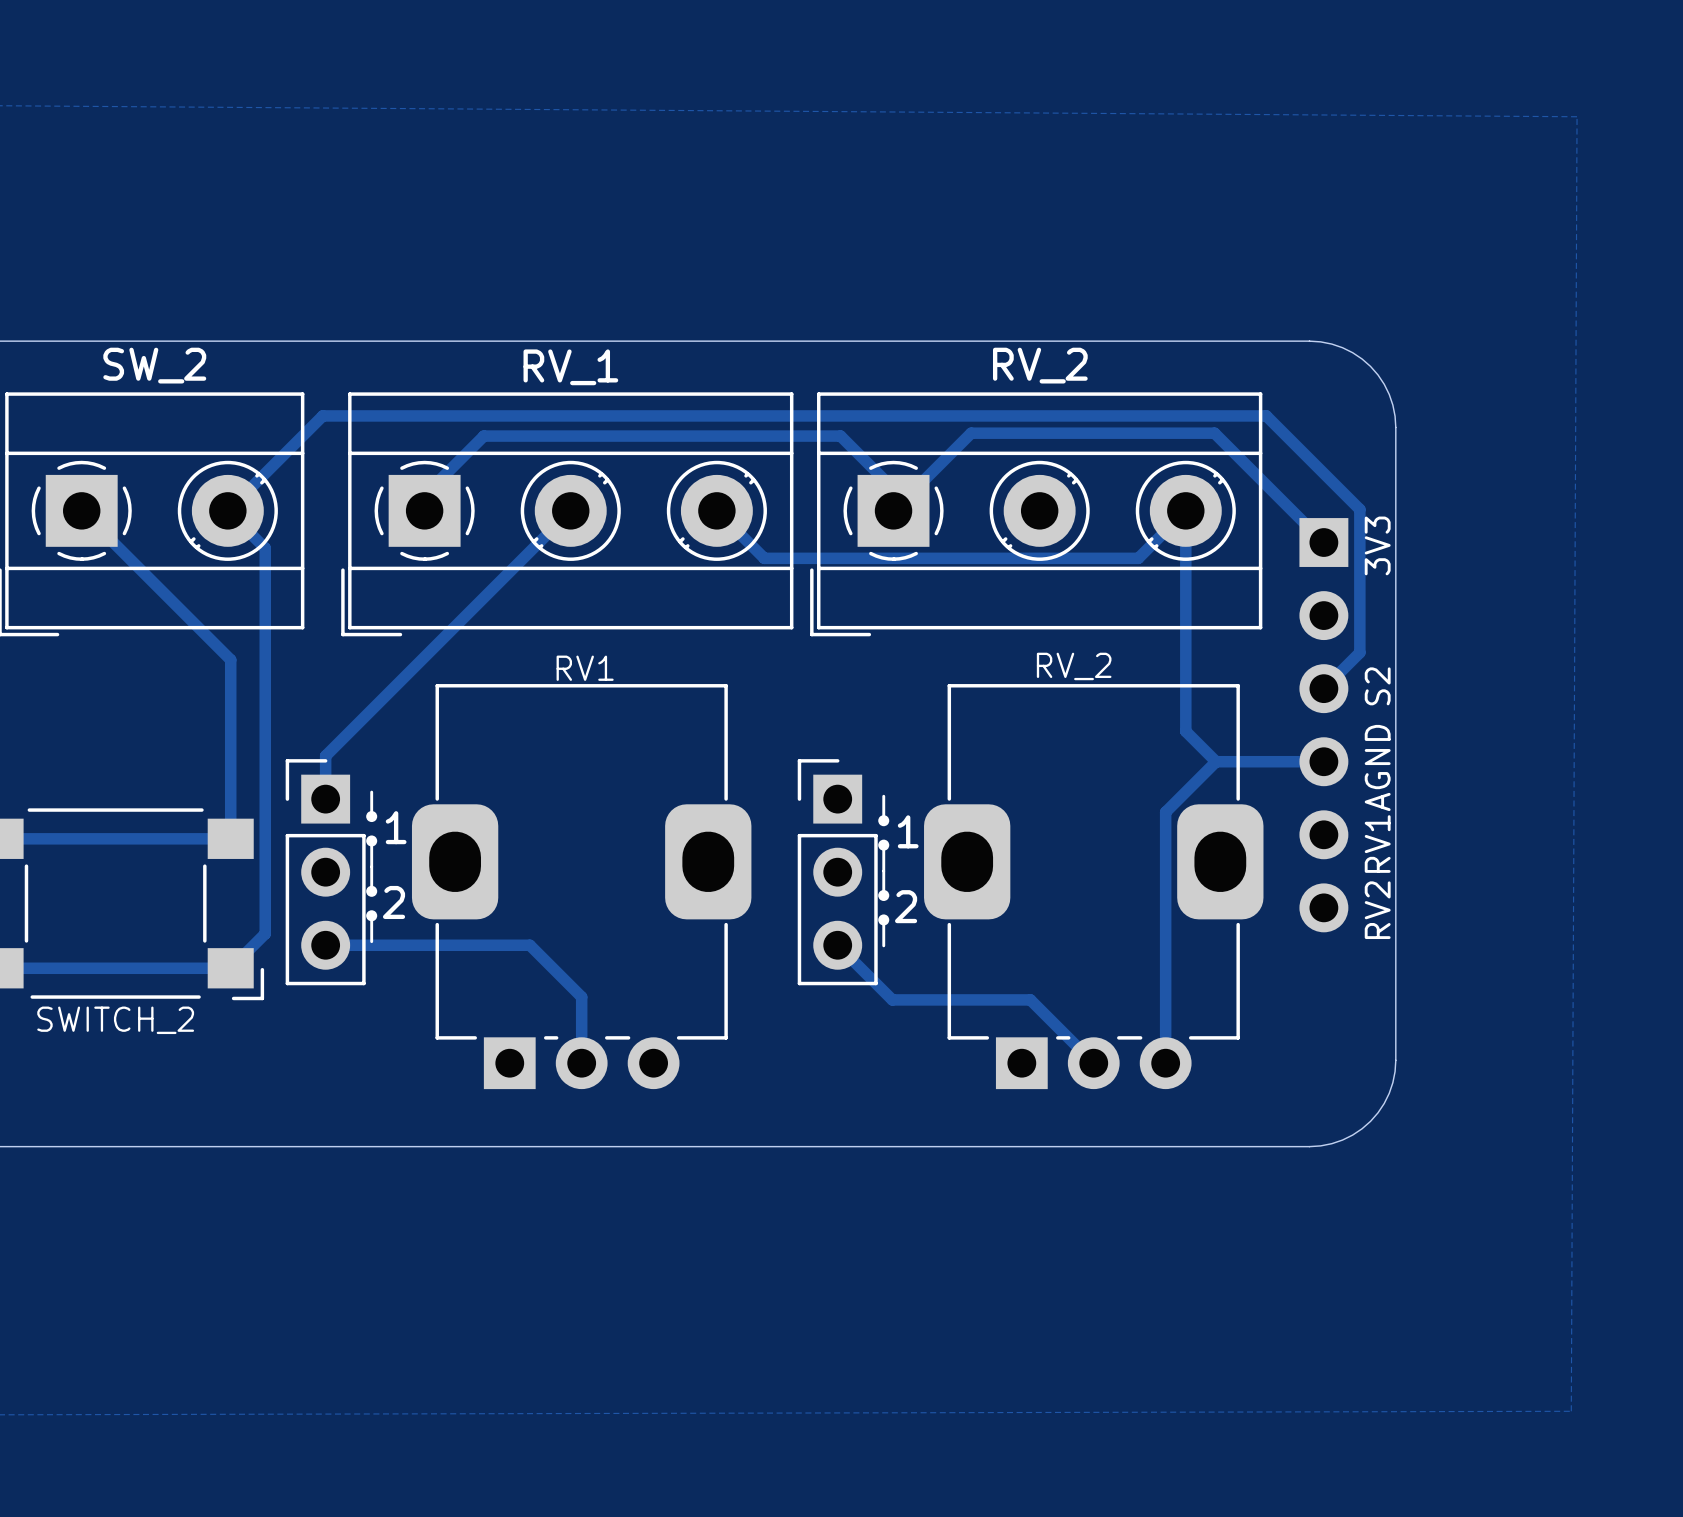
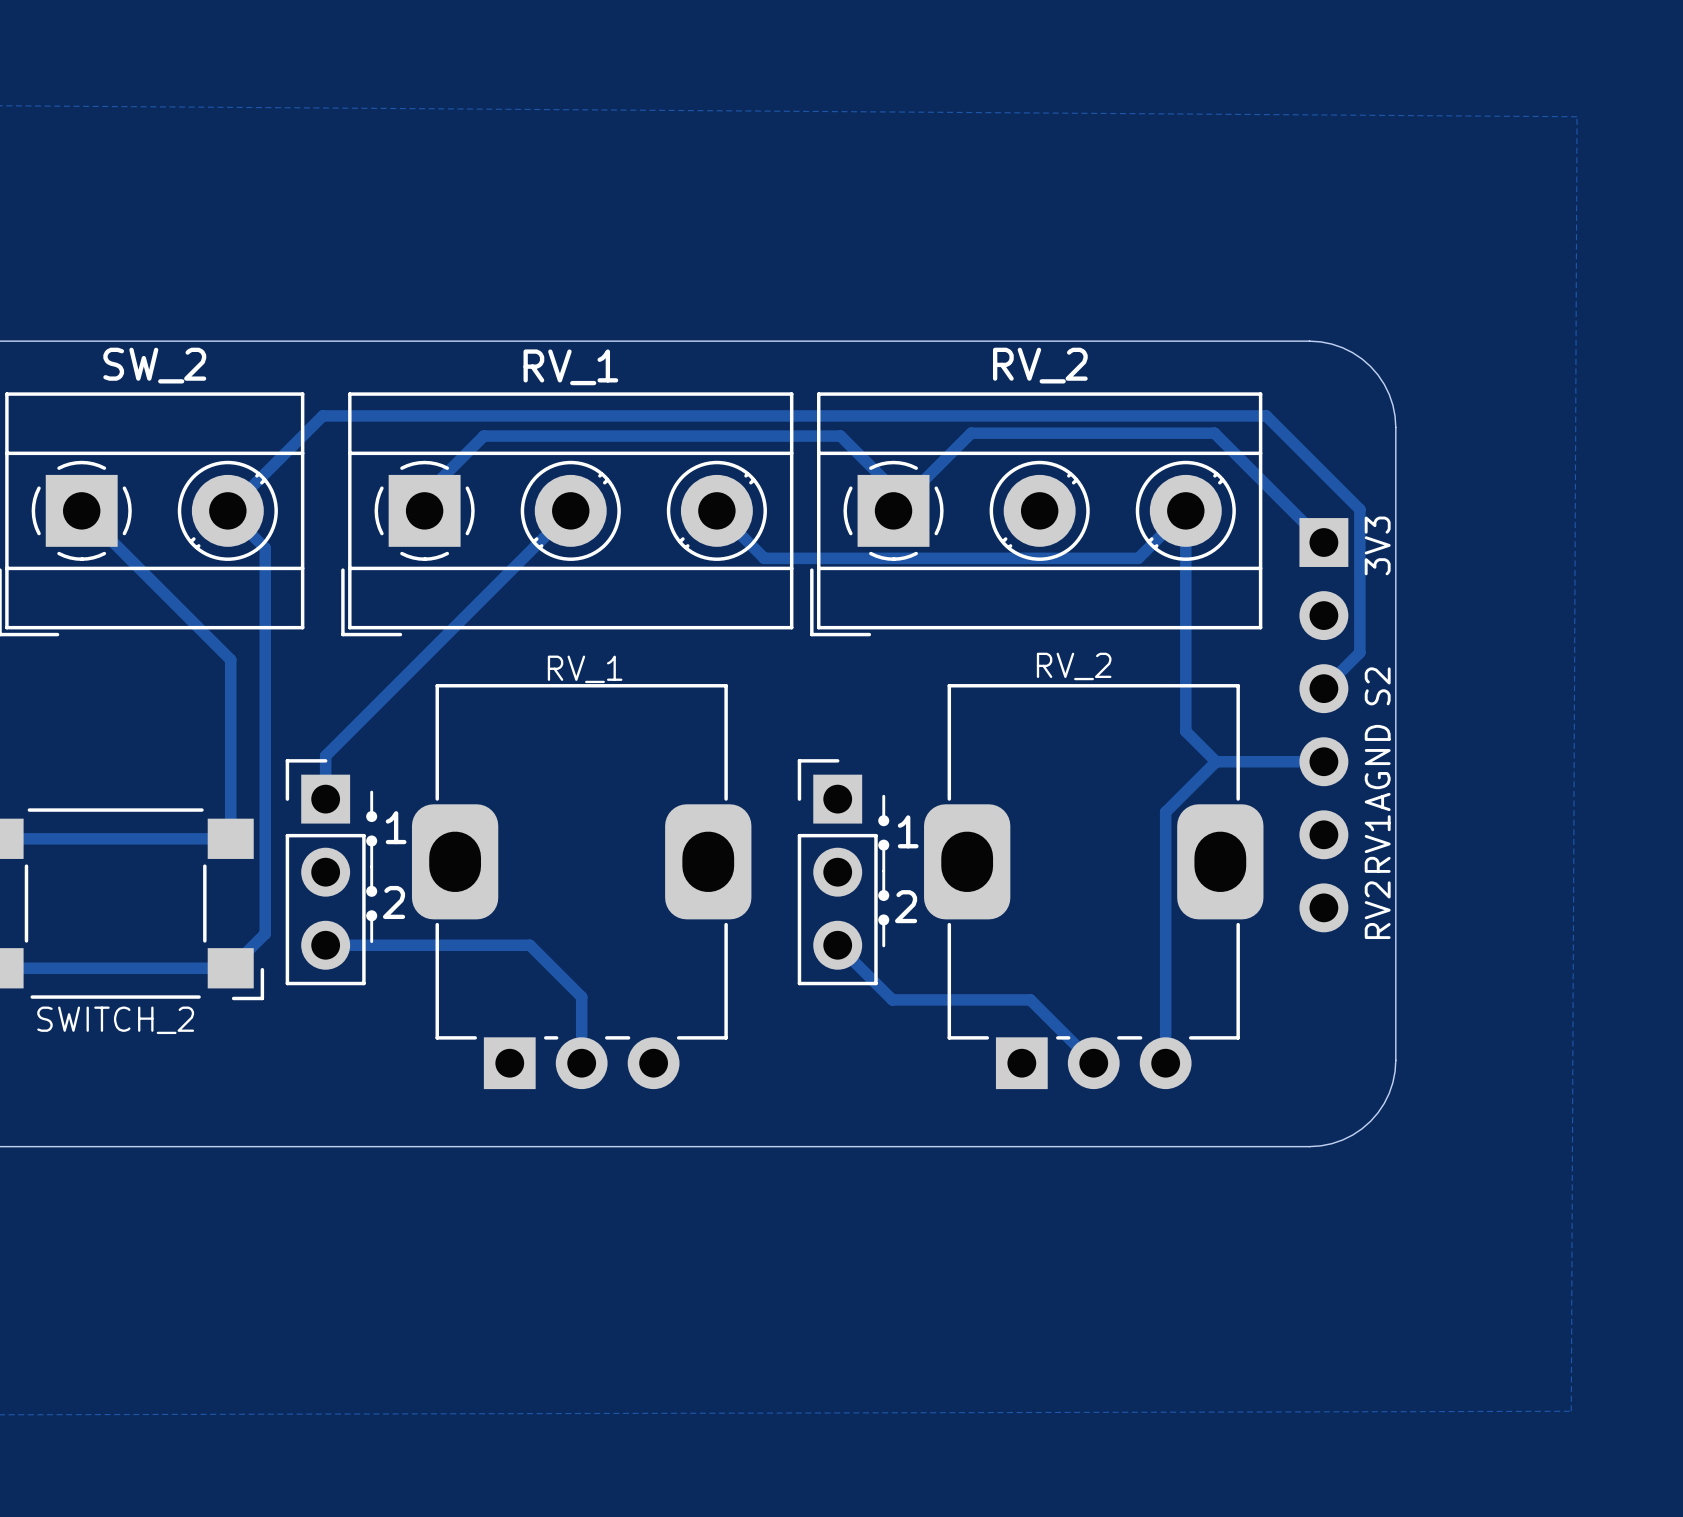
RV1 name: RV1 (585, 668) -> RV_1 (585, 669)

